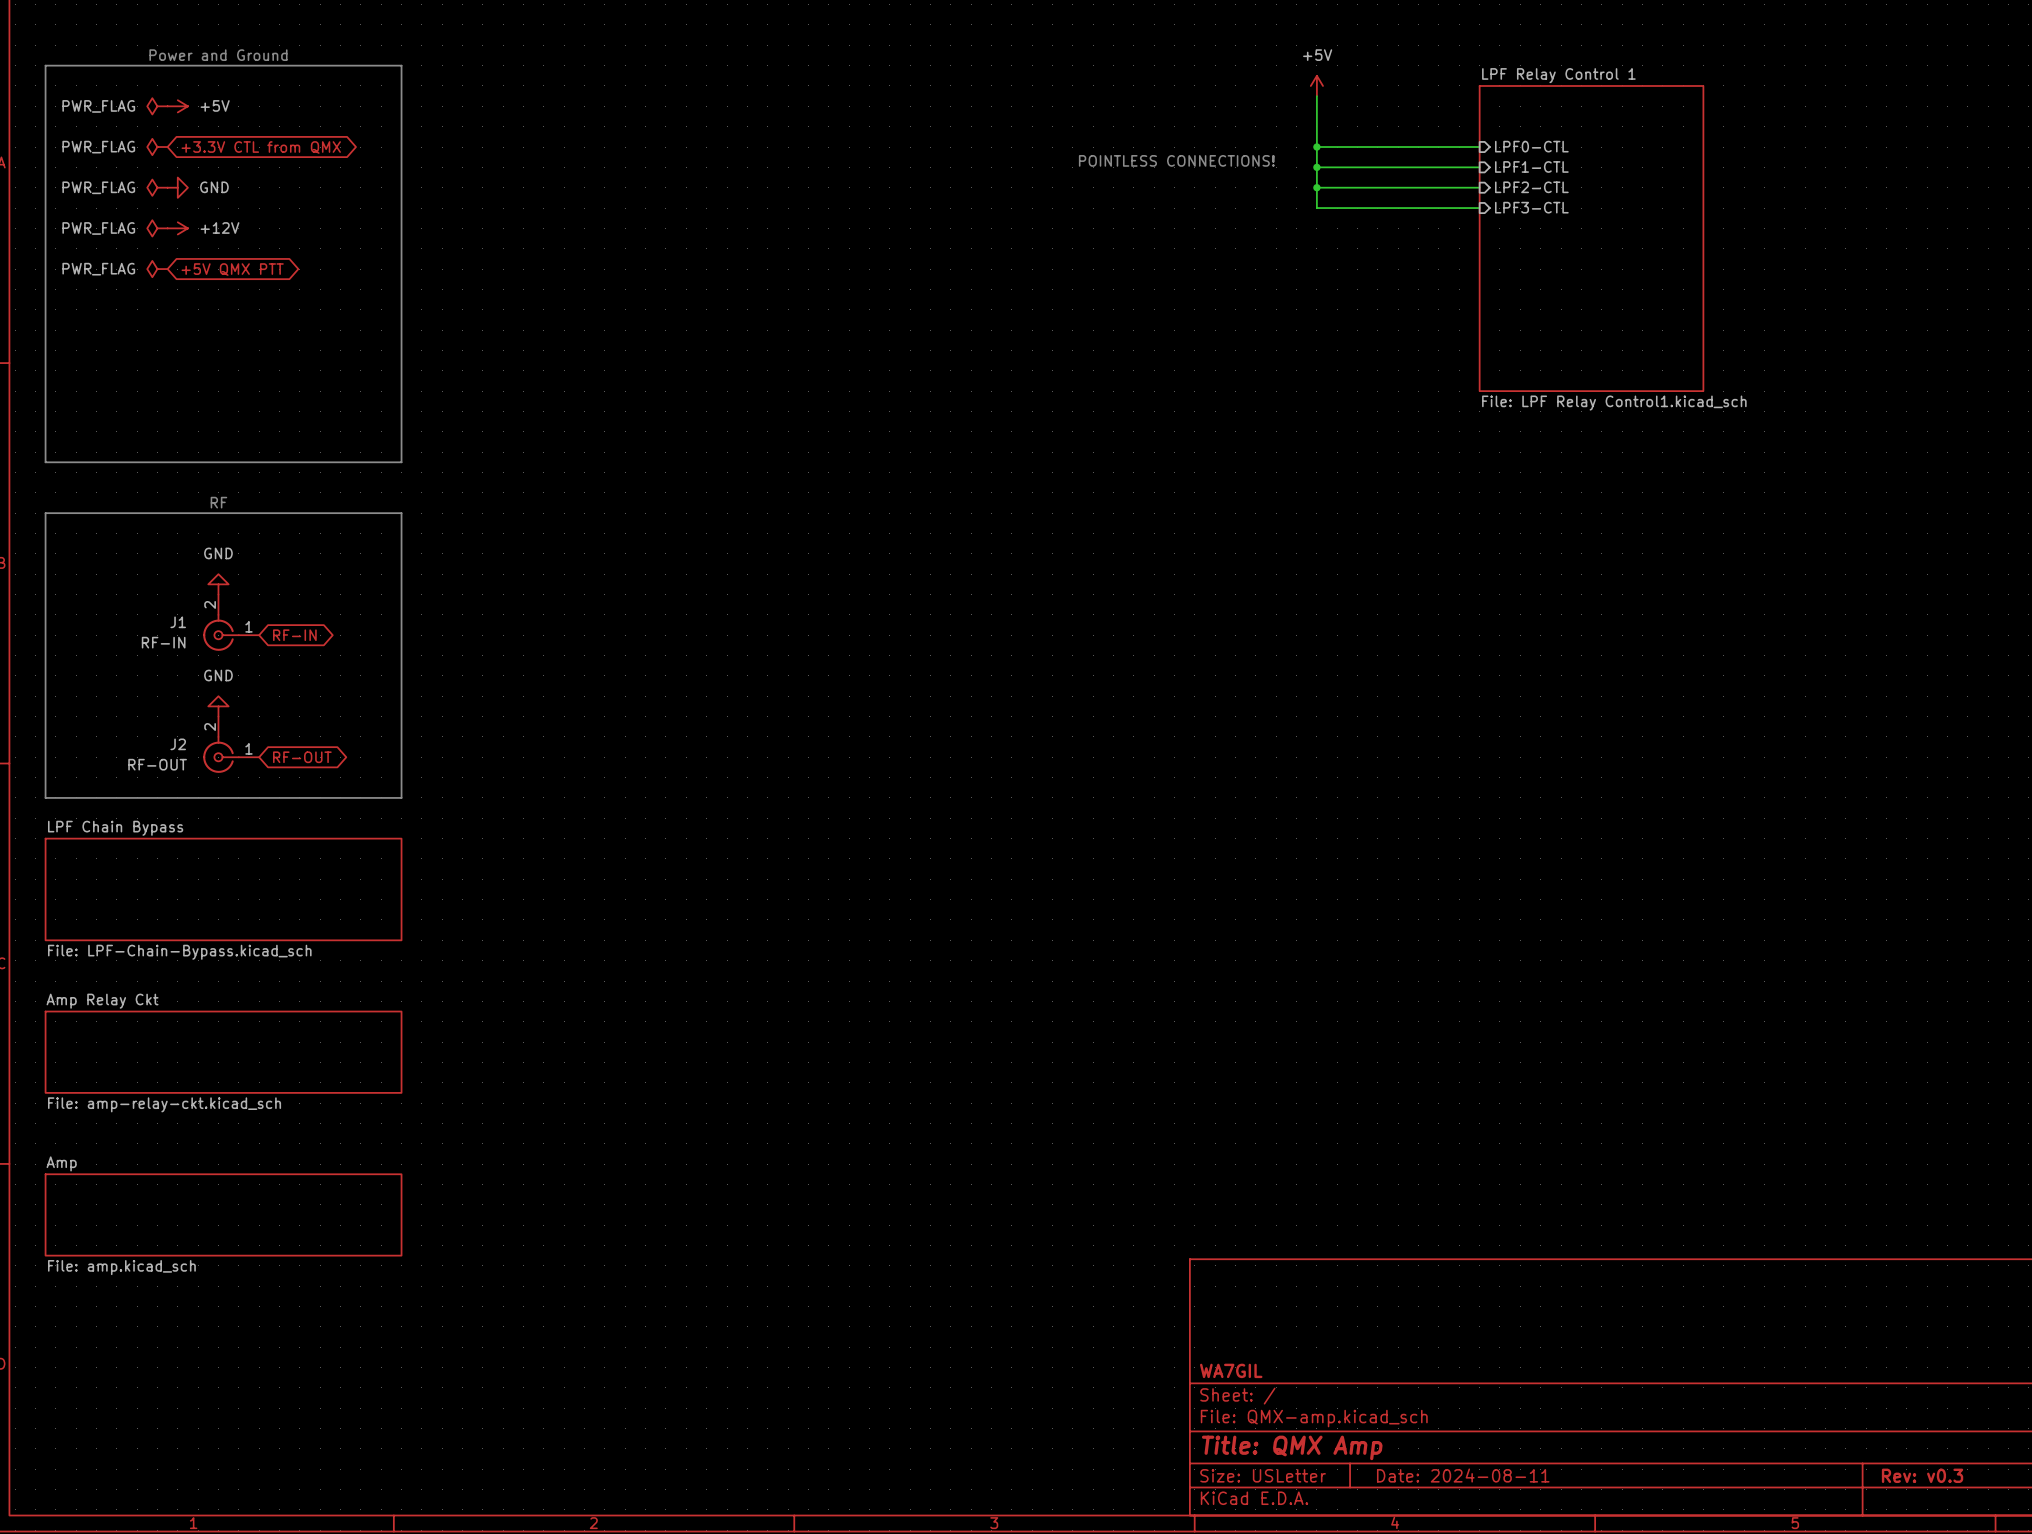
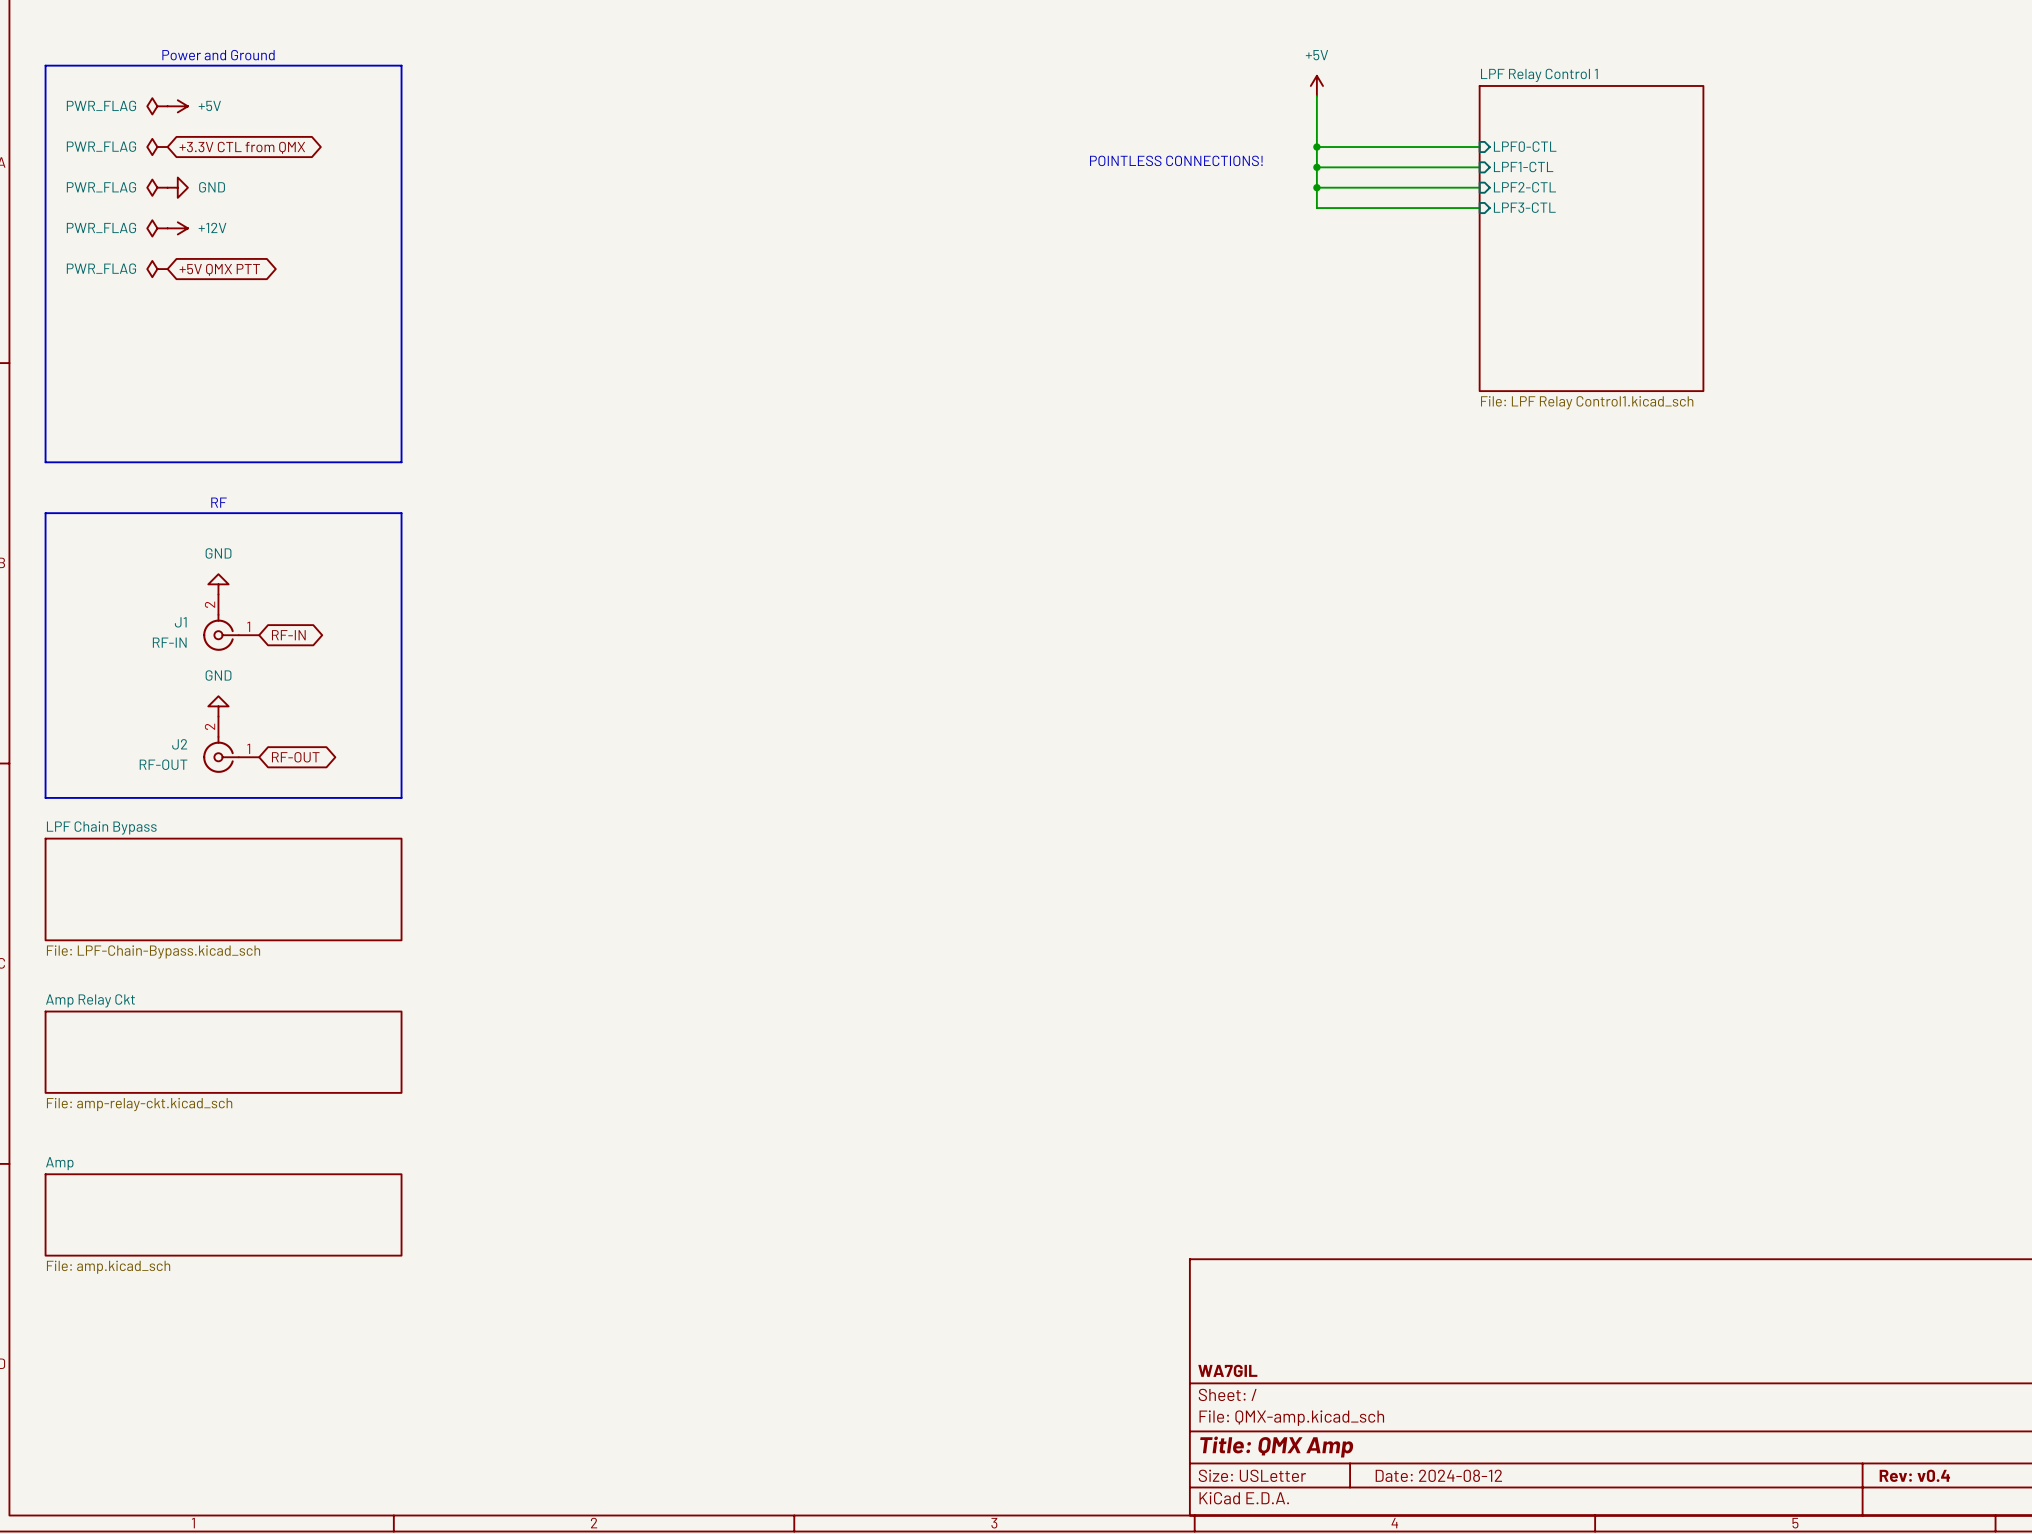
title block: Date: 2024-08-11 (1463, 1475) -> Date: 2024-08-12 (1438, 1475)
title block: Rev: v0.3 (1922, 1475) -> Rev: v0.4 (1914, 1475)

